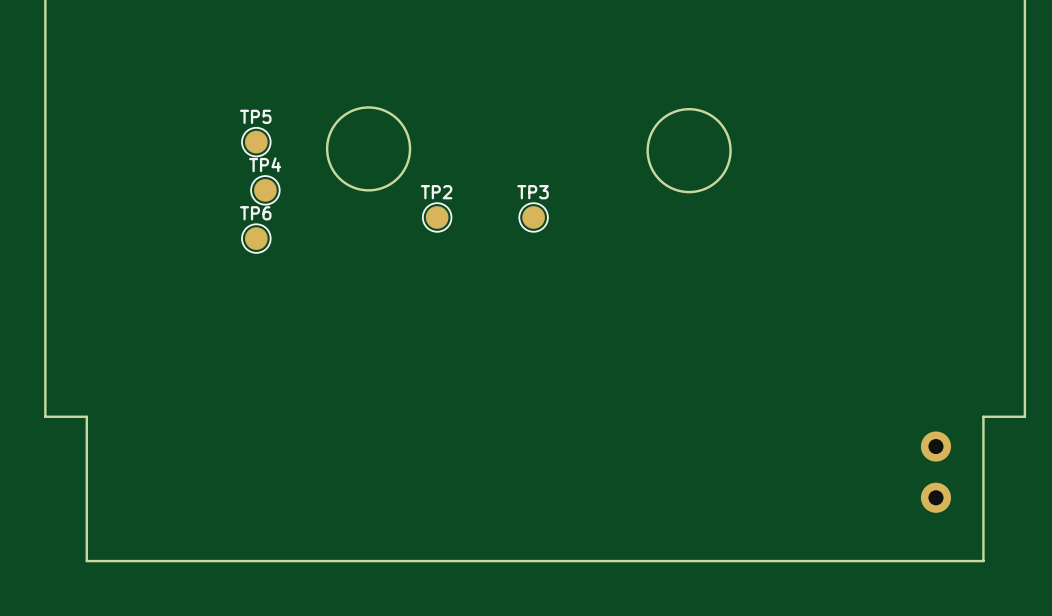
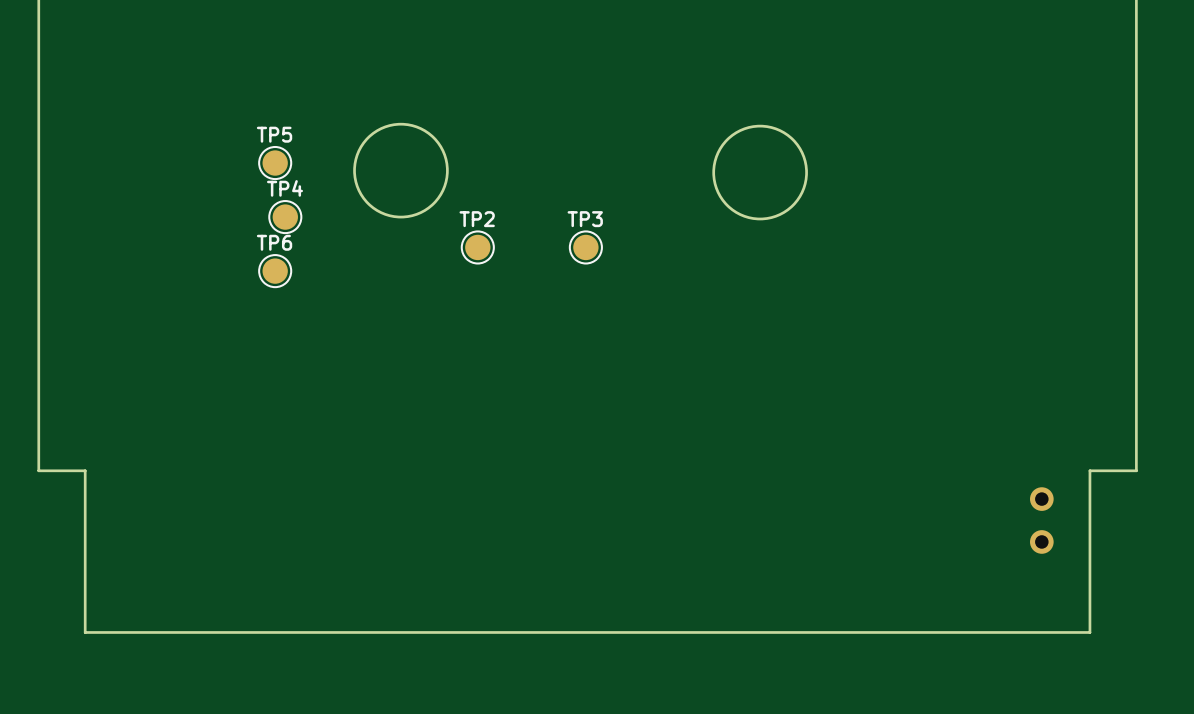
part: (935, 446) -> none
part: none -> (1041, 520)
part: (935, 497) -> none

